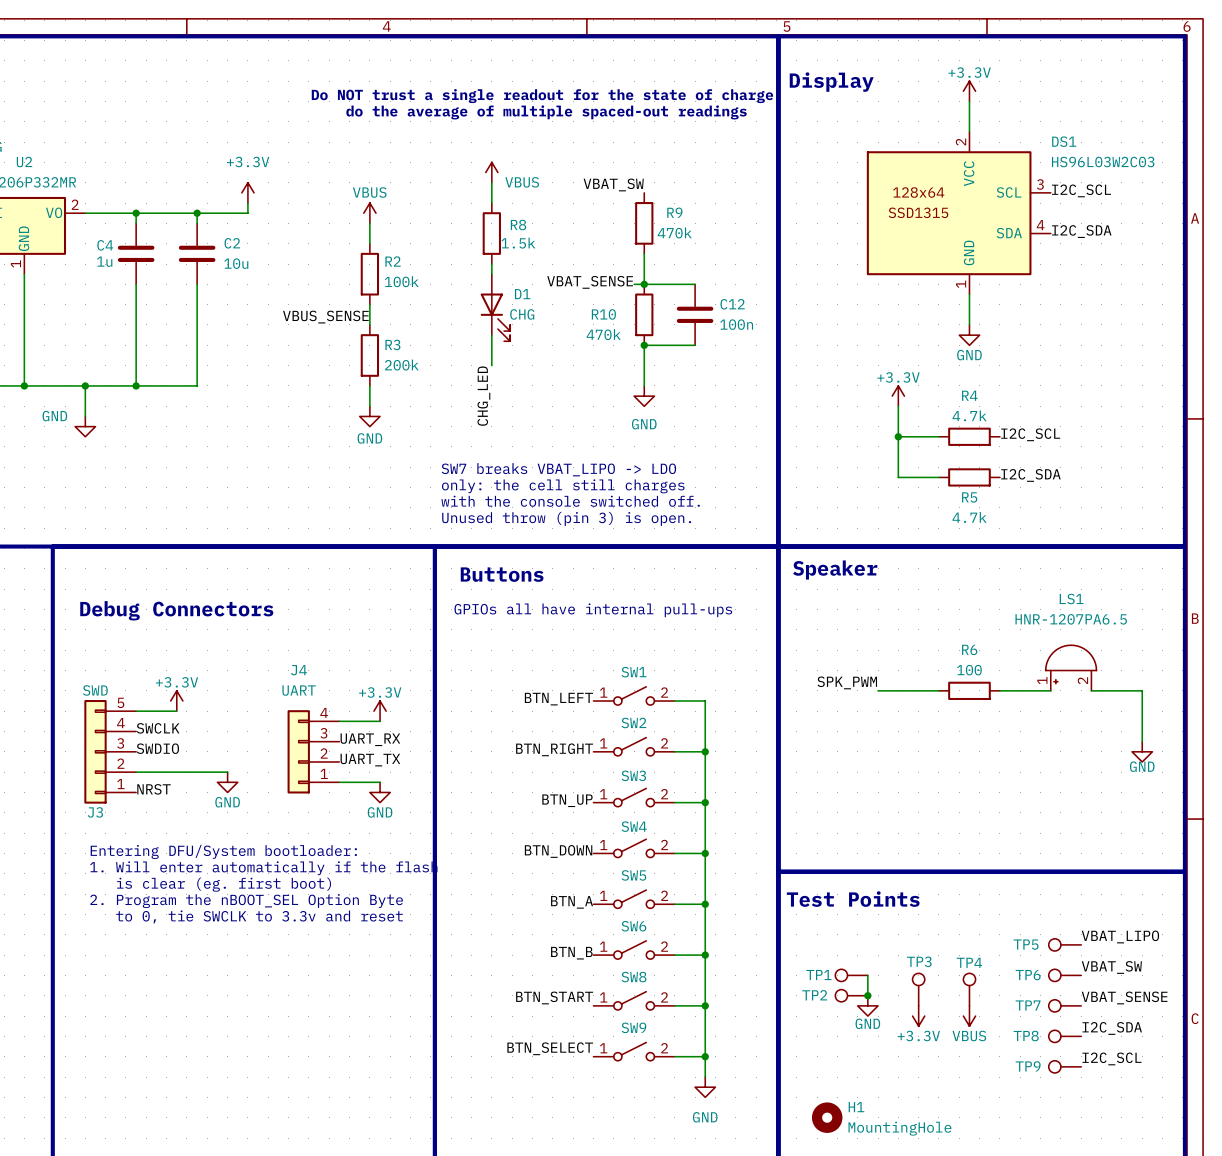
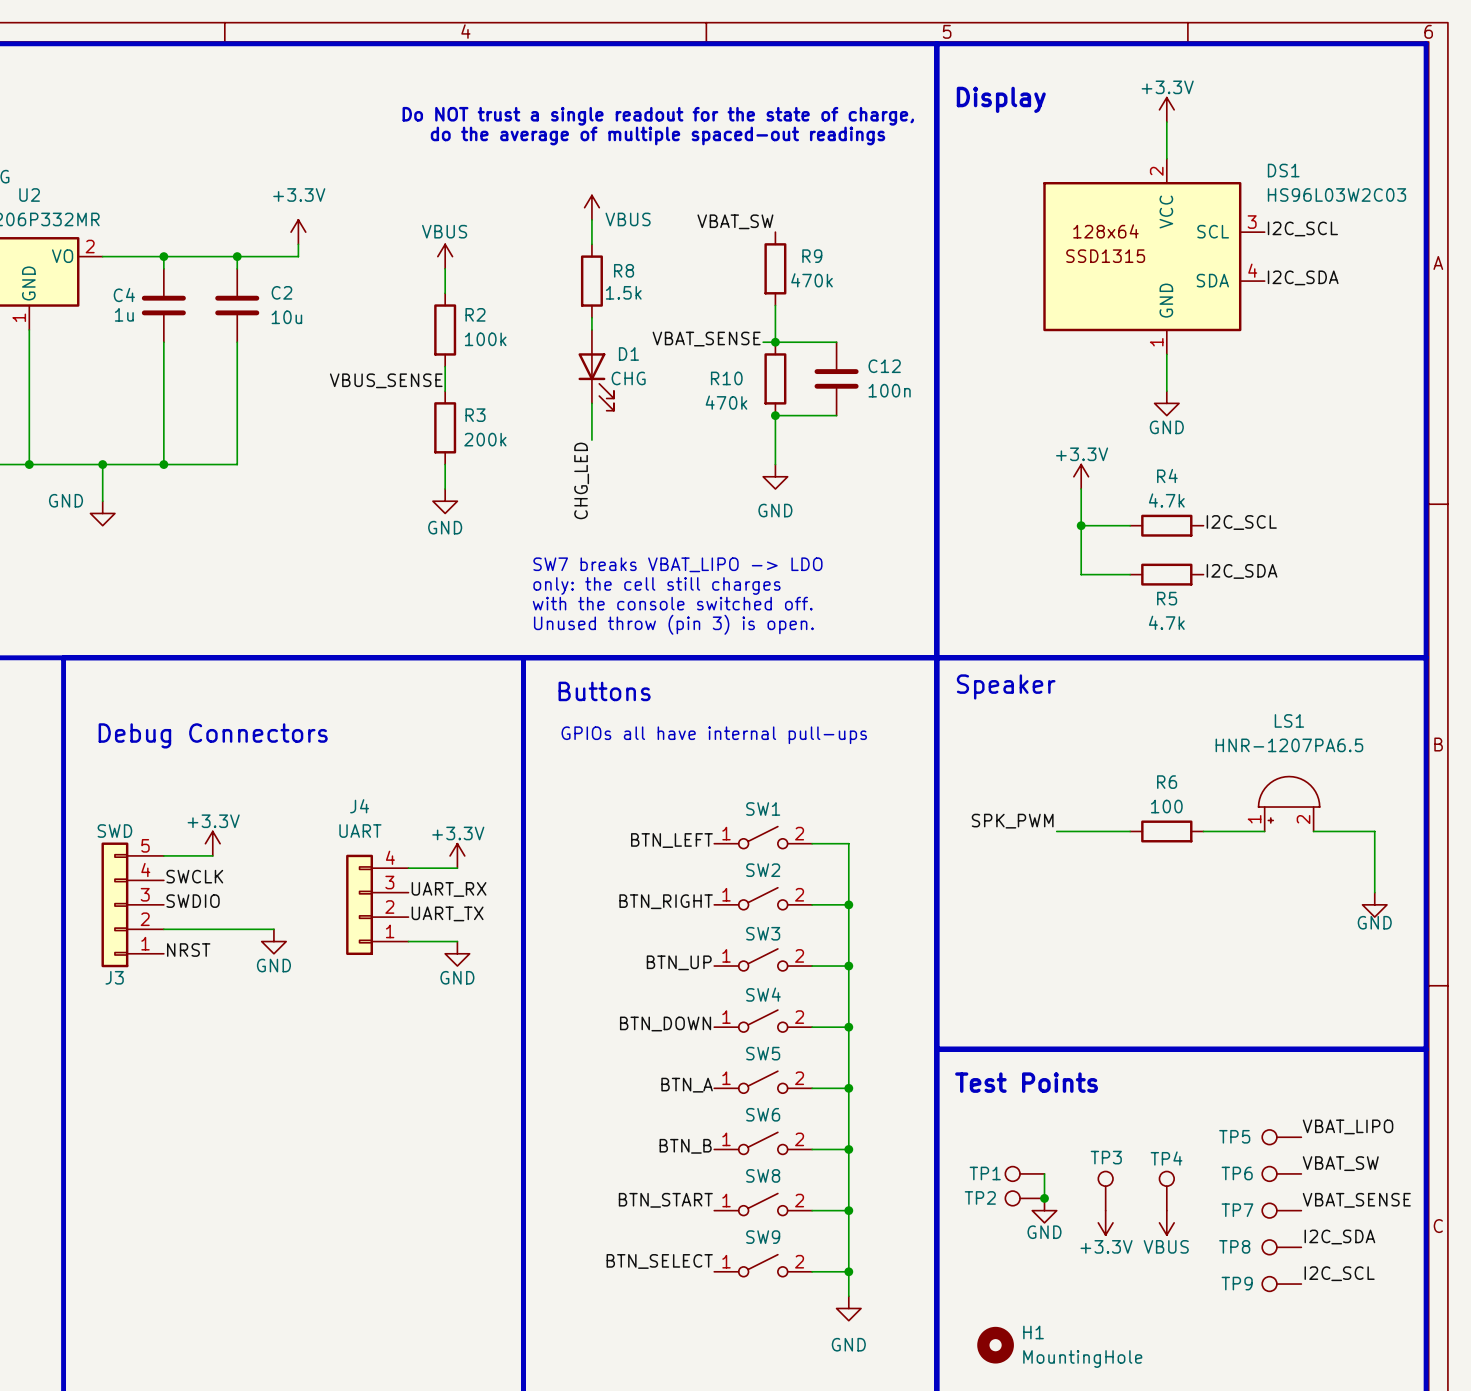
text: Entering DFU/System bootloader: (223, 851) -> none
text: 1. Will enter automatically if the flash (263, 868) -> none
text: is clear (eg. first boot) (224, 884) -> none
text: 2. Program the nBOOT_SEL Option Byte (246, 901) -> none
text: to 0, tie SWCLK to 3.3v and reset (259, 916) -> none

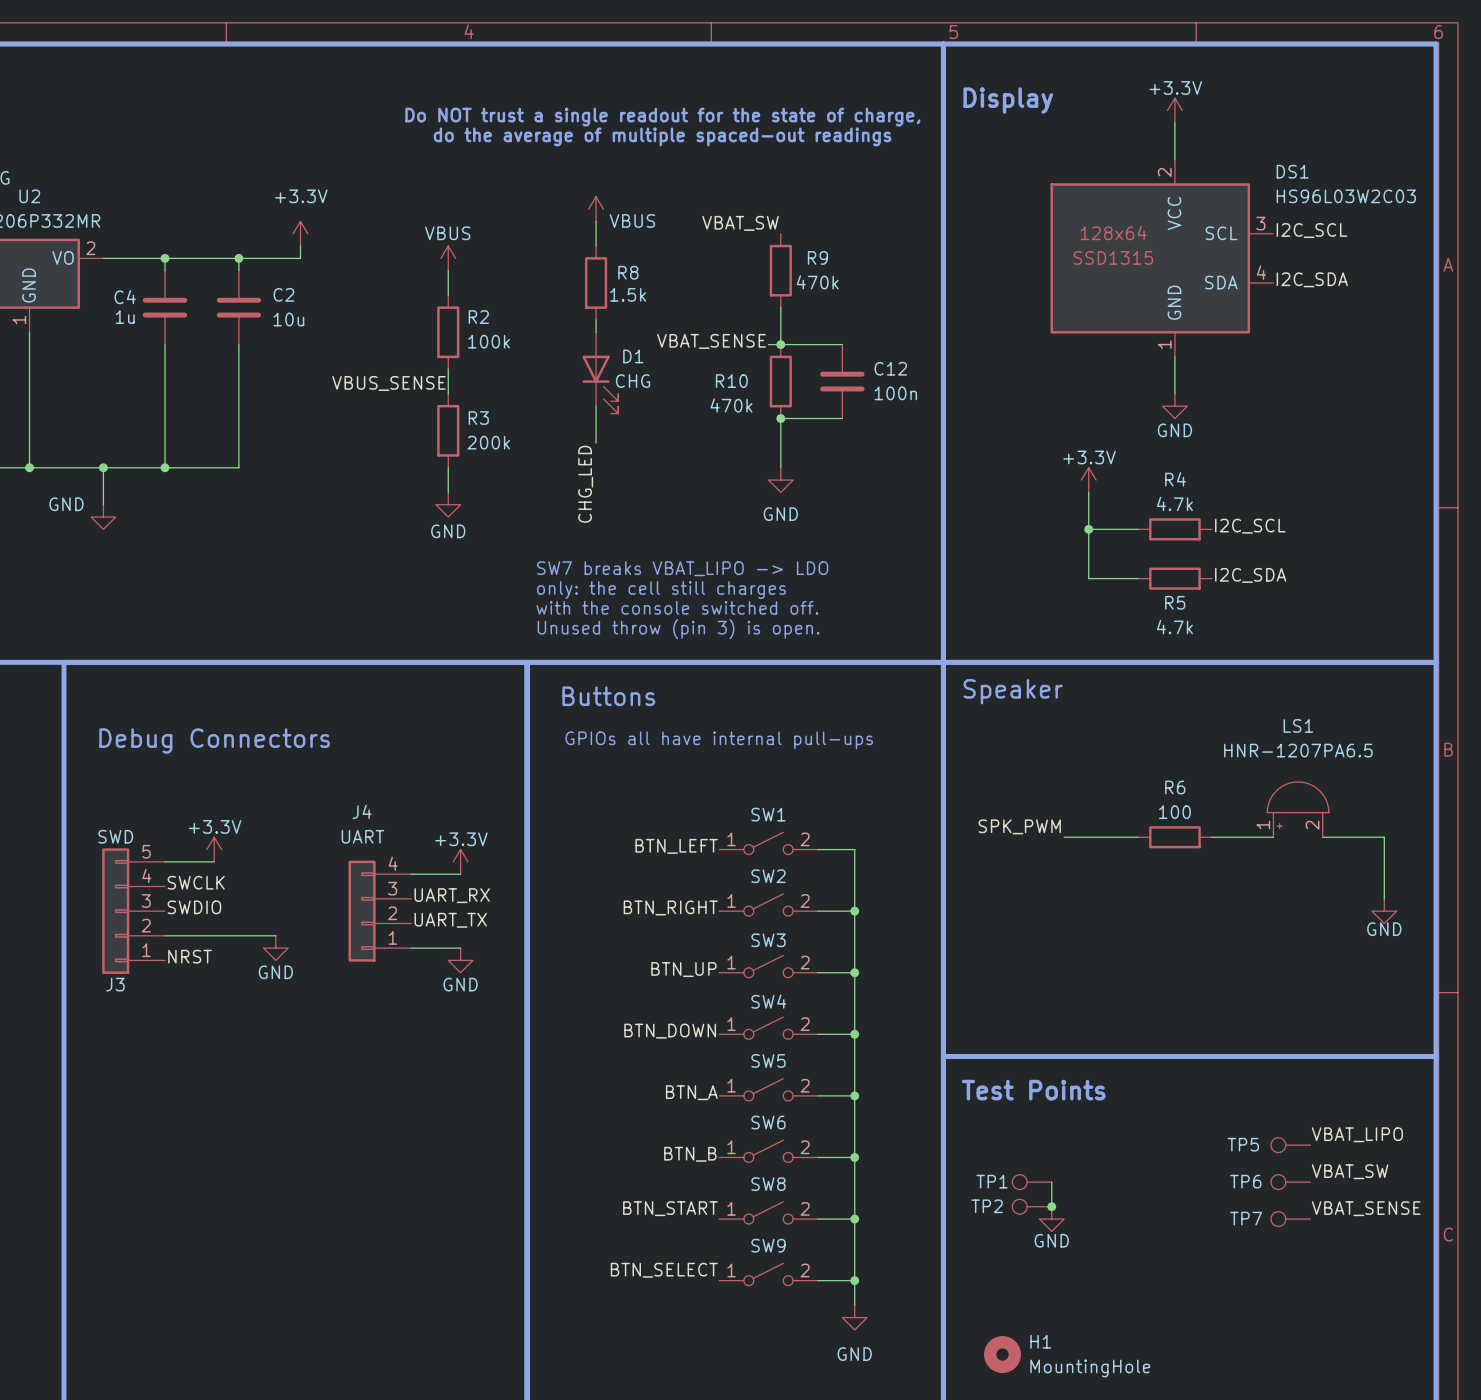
TP3: (1105, 1191) -> none
TP4: (1166, 1191) -> none
power symbol: +3.3V (1105, 1222) -> none
power symbol: VBUS (1166, 1222) -> none
label: I2C_SDA (1339, 1237) -> none
TP8: (1281, 1247) -> none
label: I2C_SCL (1339, 1273) -> none
TP9: (1281, 1284) -> none

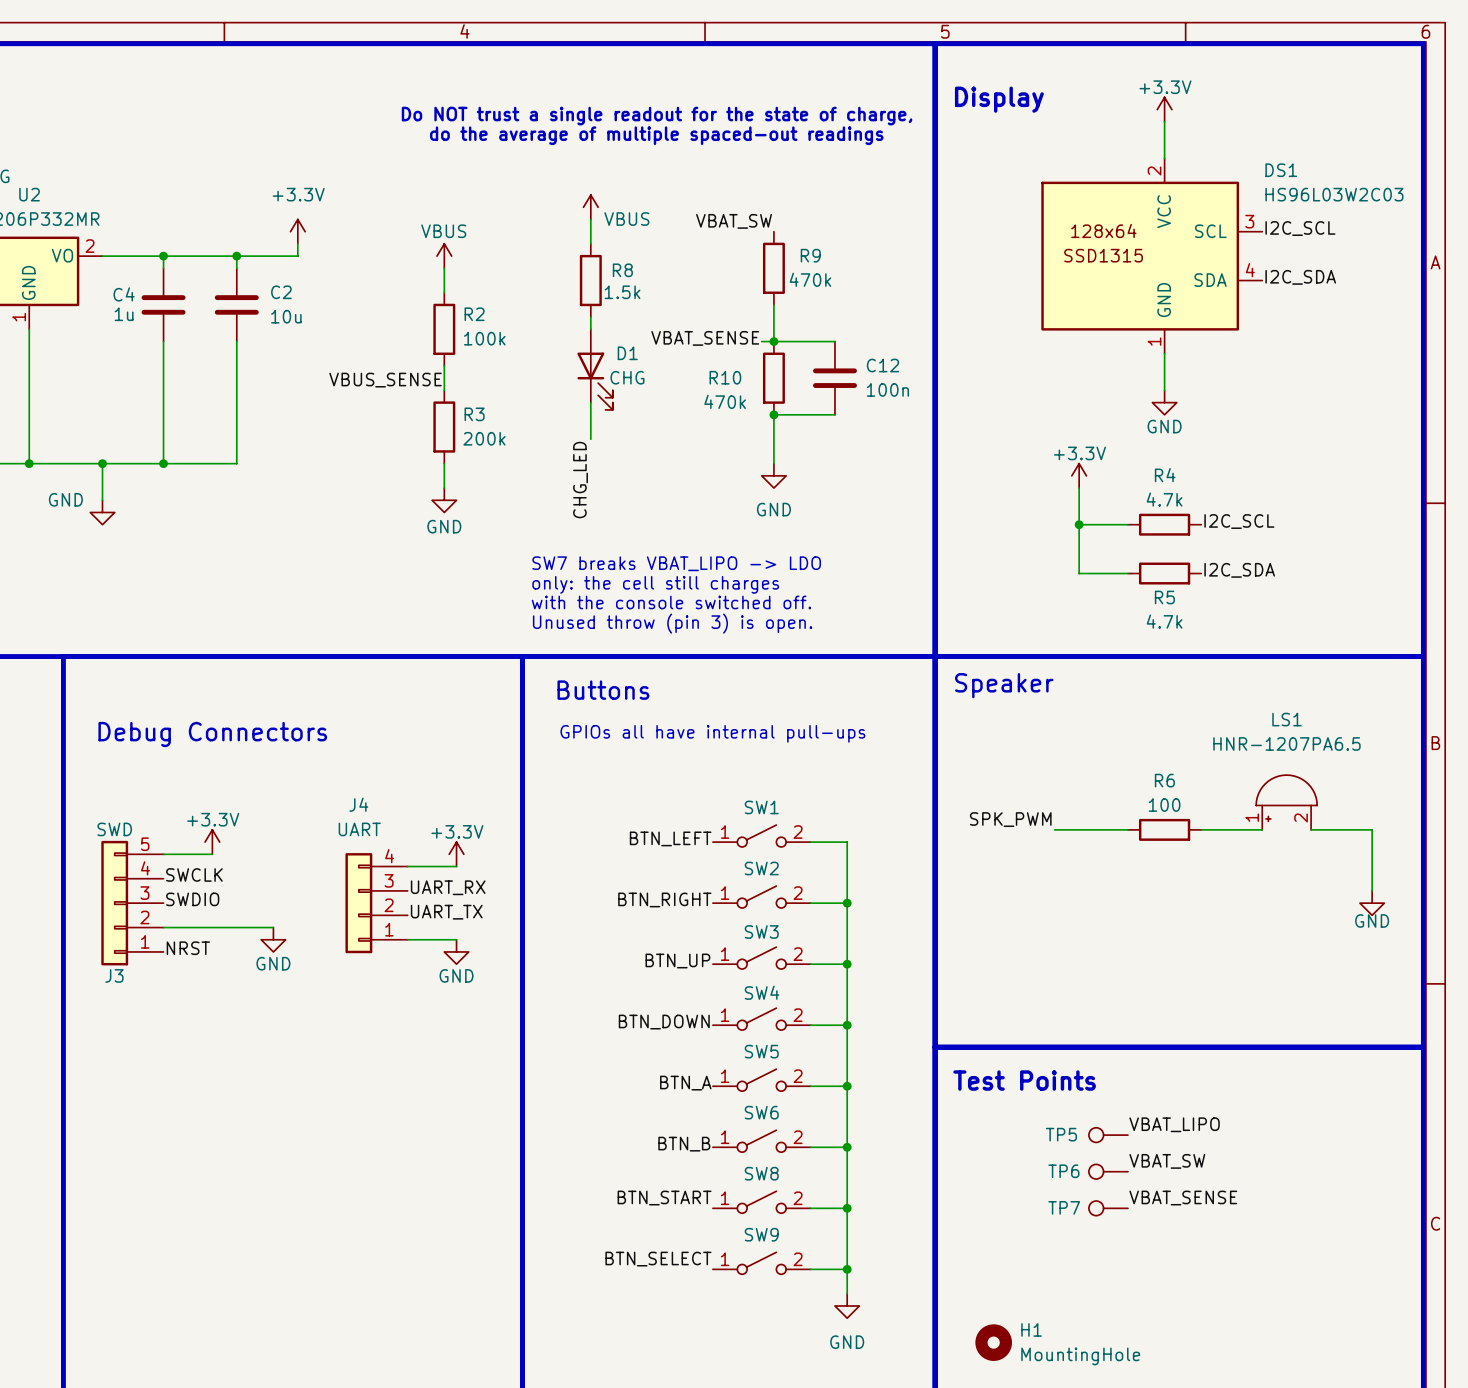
label position: VBAT_LIPO (1357, 1134) -> VBAT_LIPO (1174, 1124)
TP5 position: (1290, 1145) -> (1108, 1135)
label position: VBAT_SW (1350, 1171) -> VBAT_SW (1167, 1161)
TP1: (1032, 1182) -> none
wire: (1051, 1182) (1051, 1206) -> none
TP6 position: (1290, 1182) -> (1108, 1171)
TP2: (1032, 1206) -> none
junction: (1051, 1206) -> none
label position: VBAT_SENSE (1366, 1208) -> VBAT_SENSE (1183, 1198)
power symbol: GND (1051, 1219) -> none
TP7 position: (1290, 1219) -> (1108, 1208)

